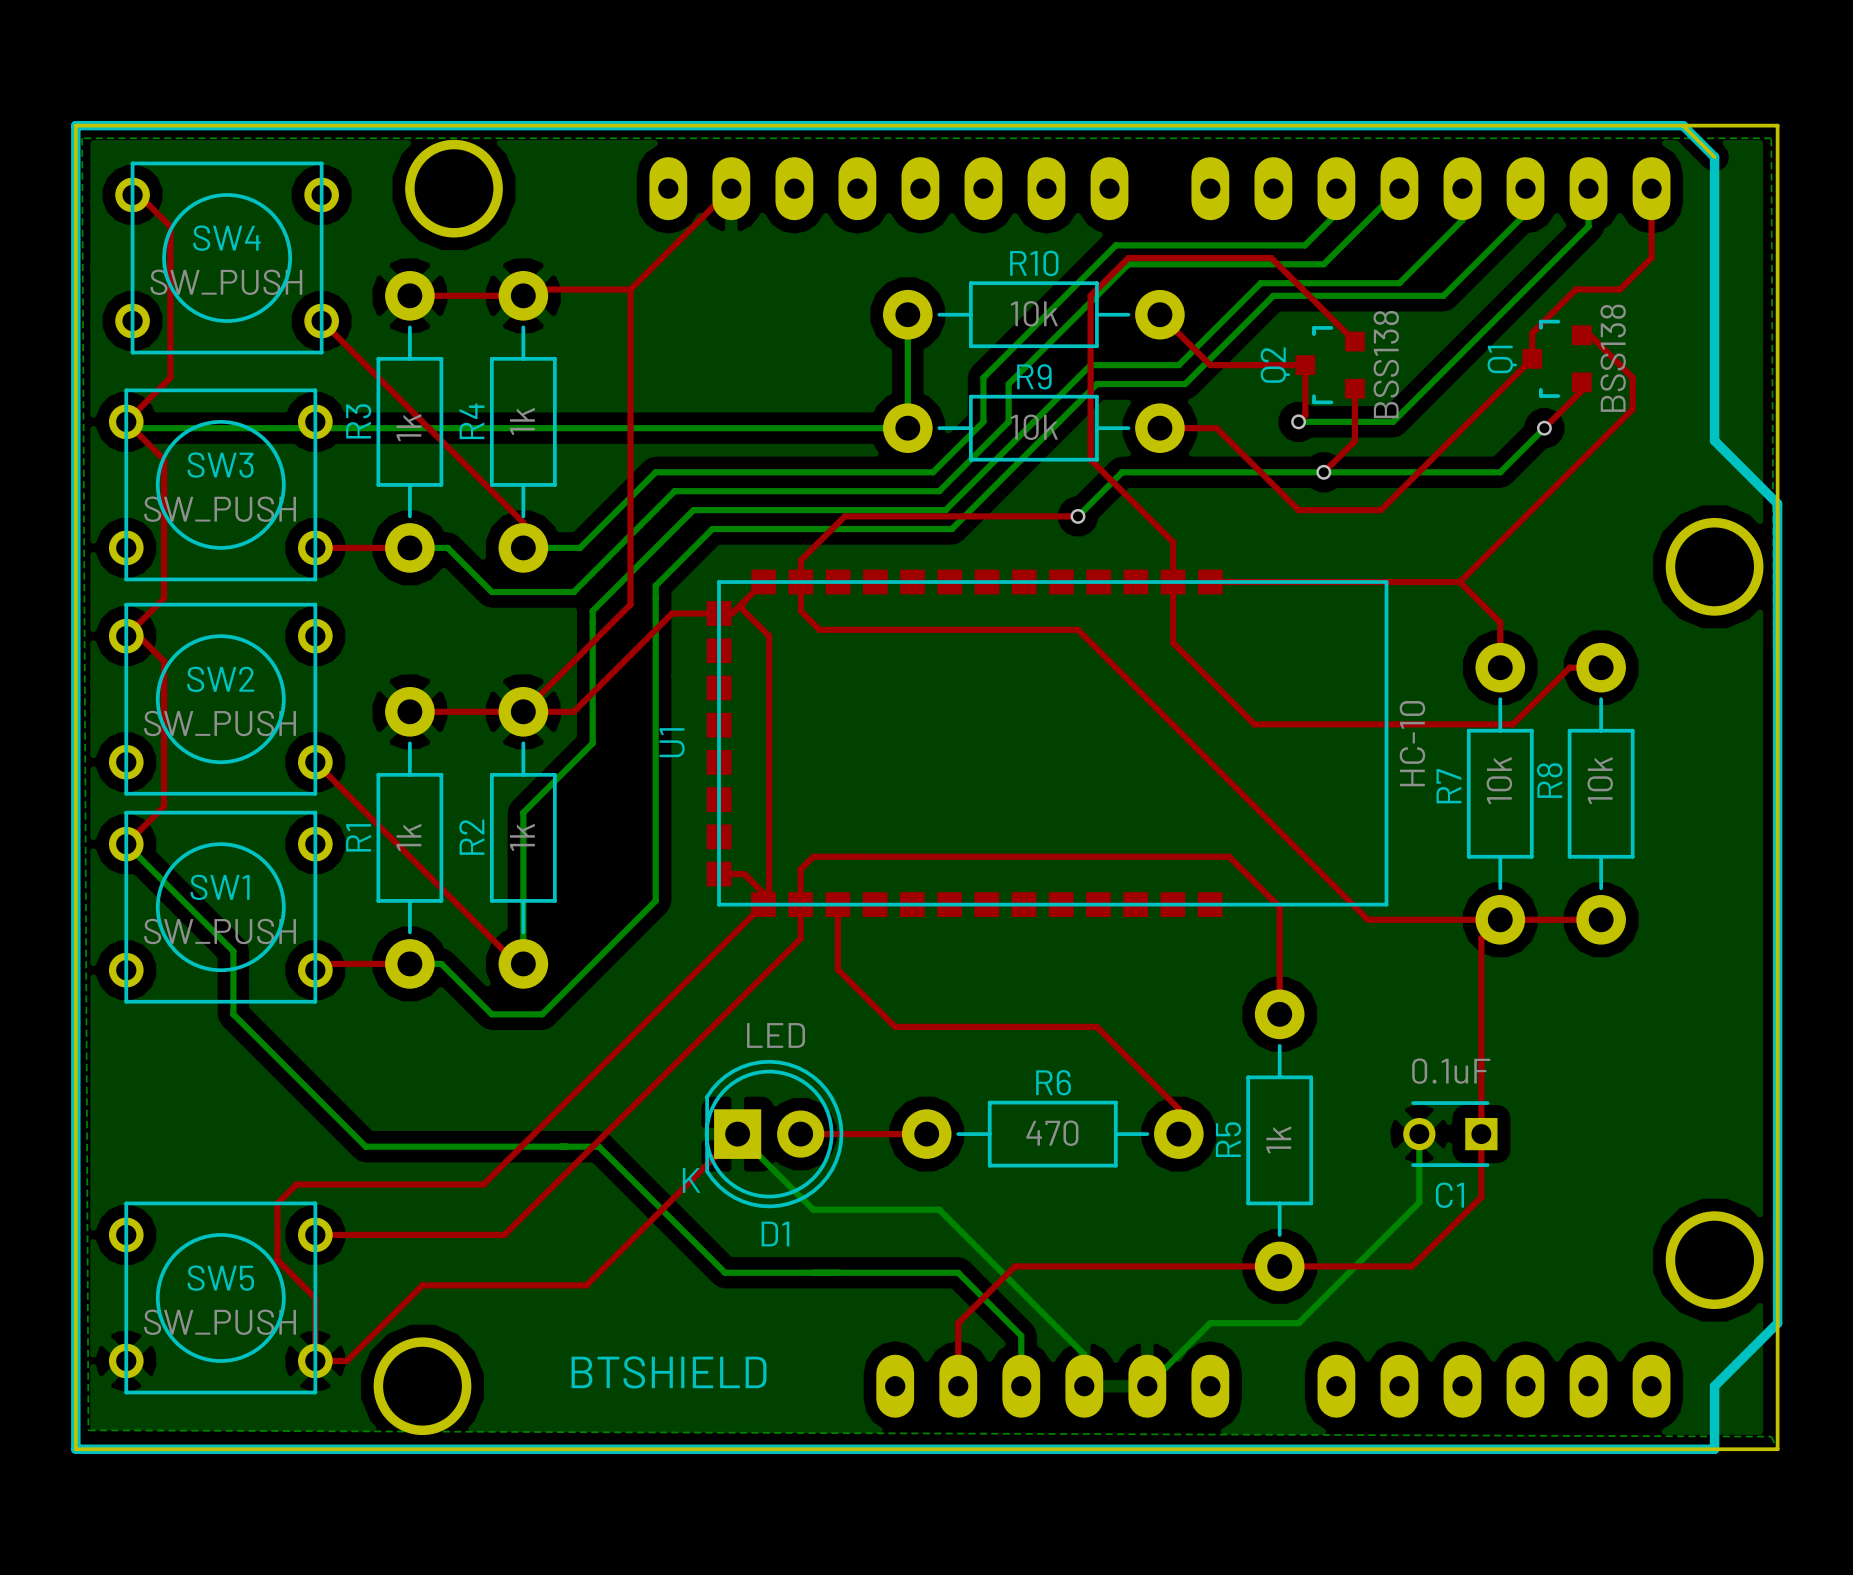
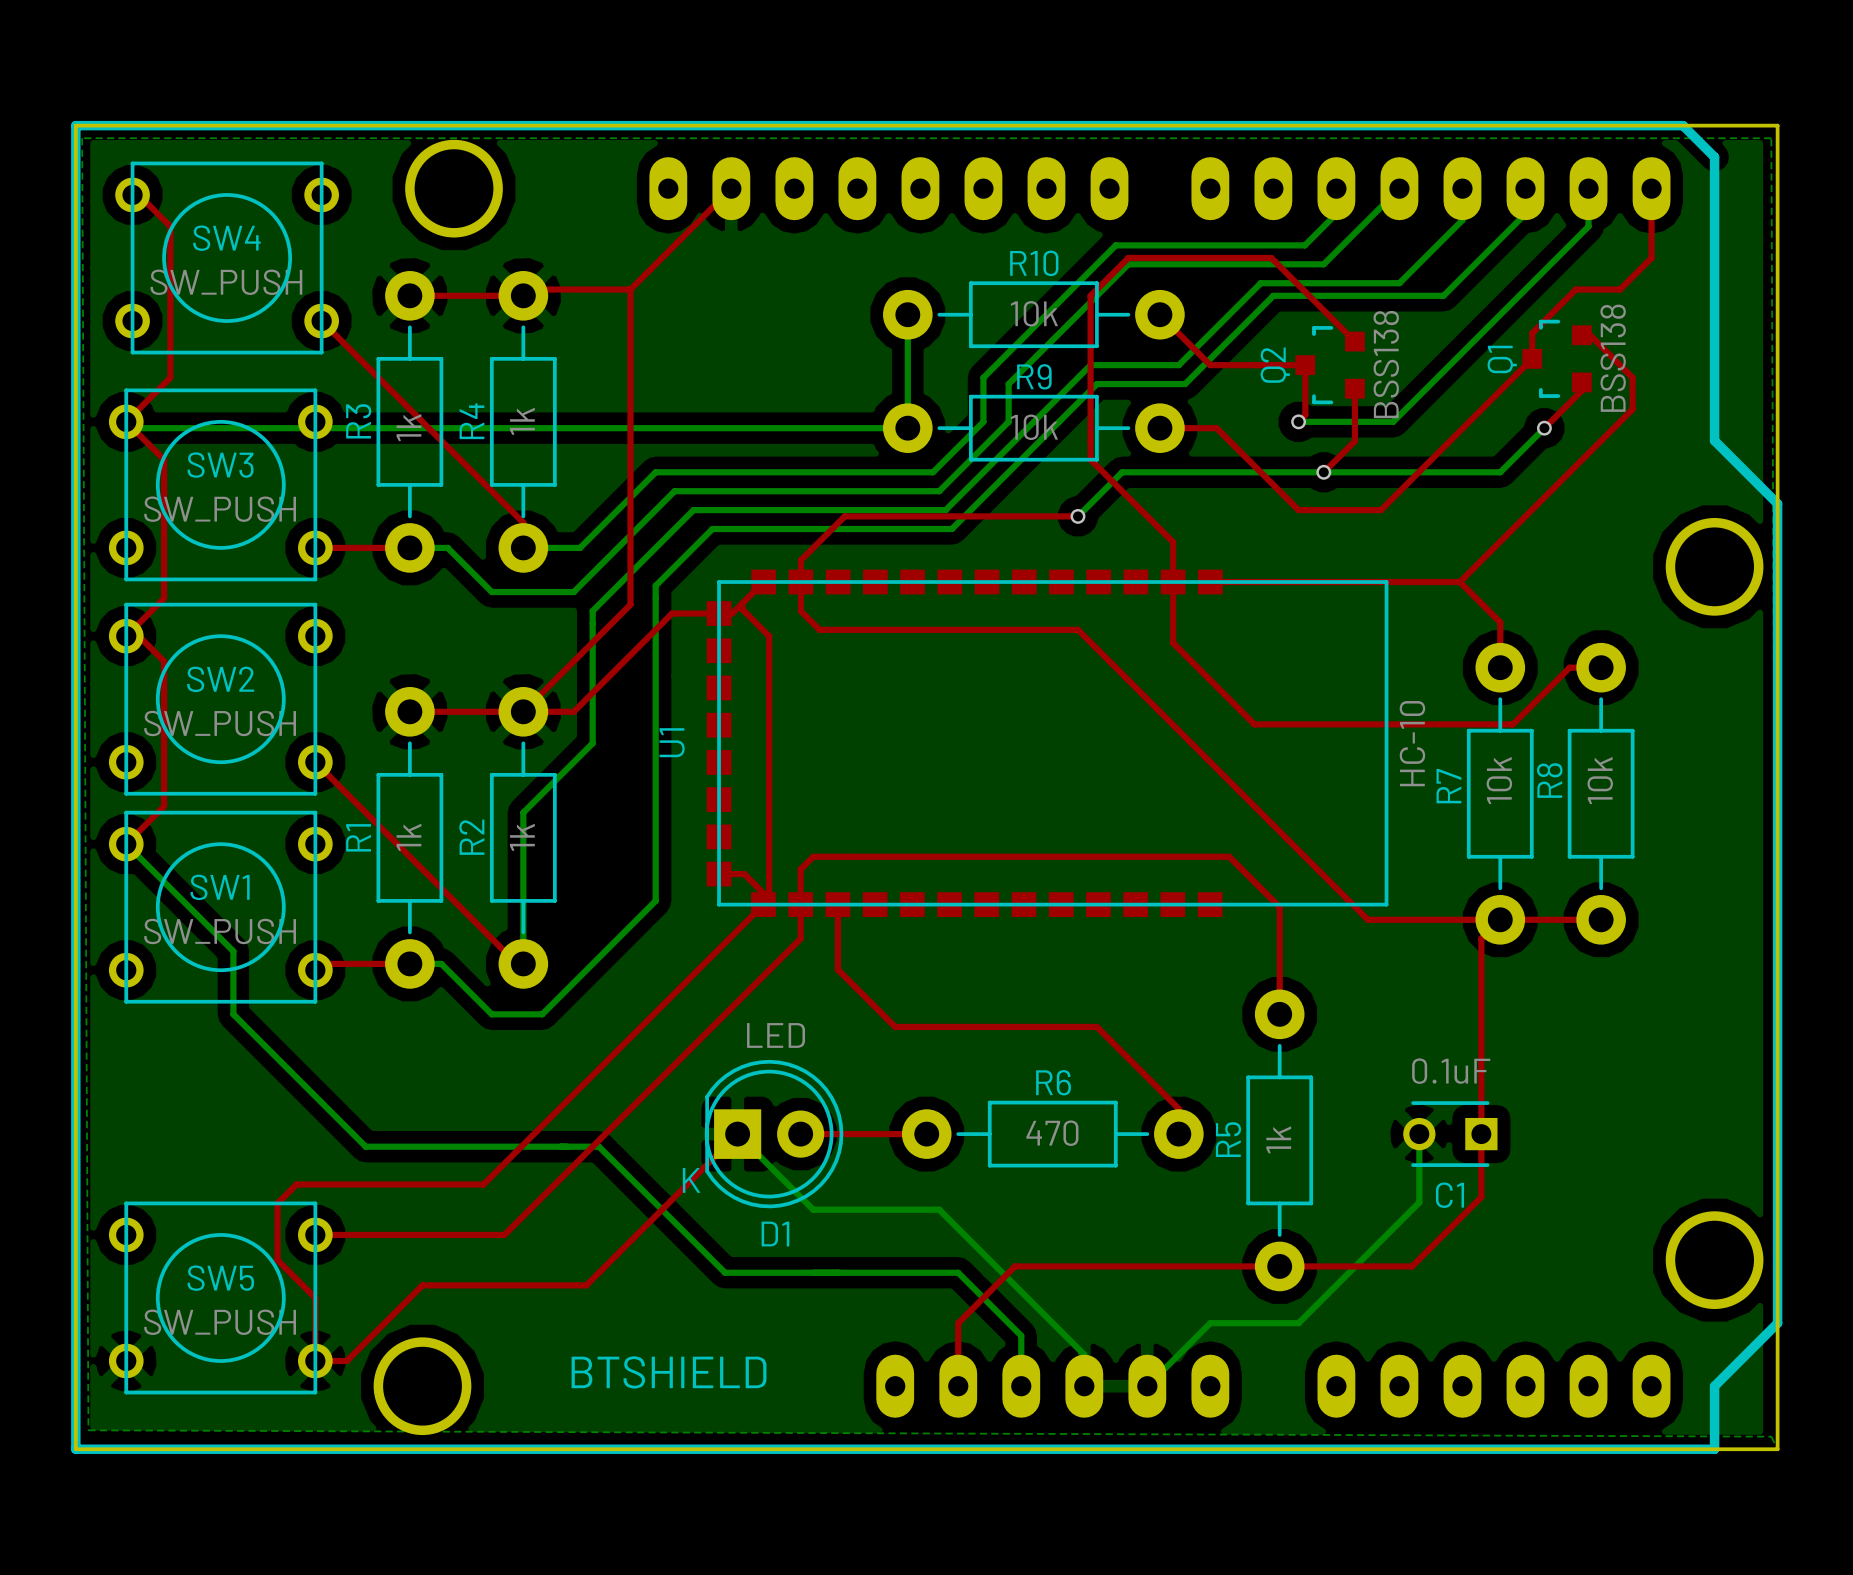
board edge: (1683, 125) (1714, 157) -> none

